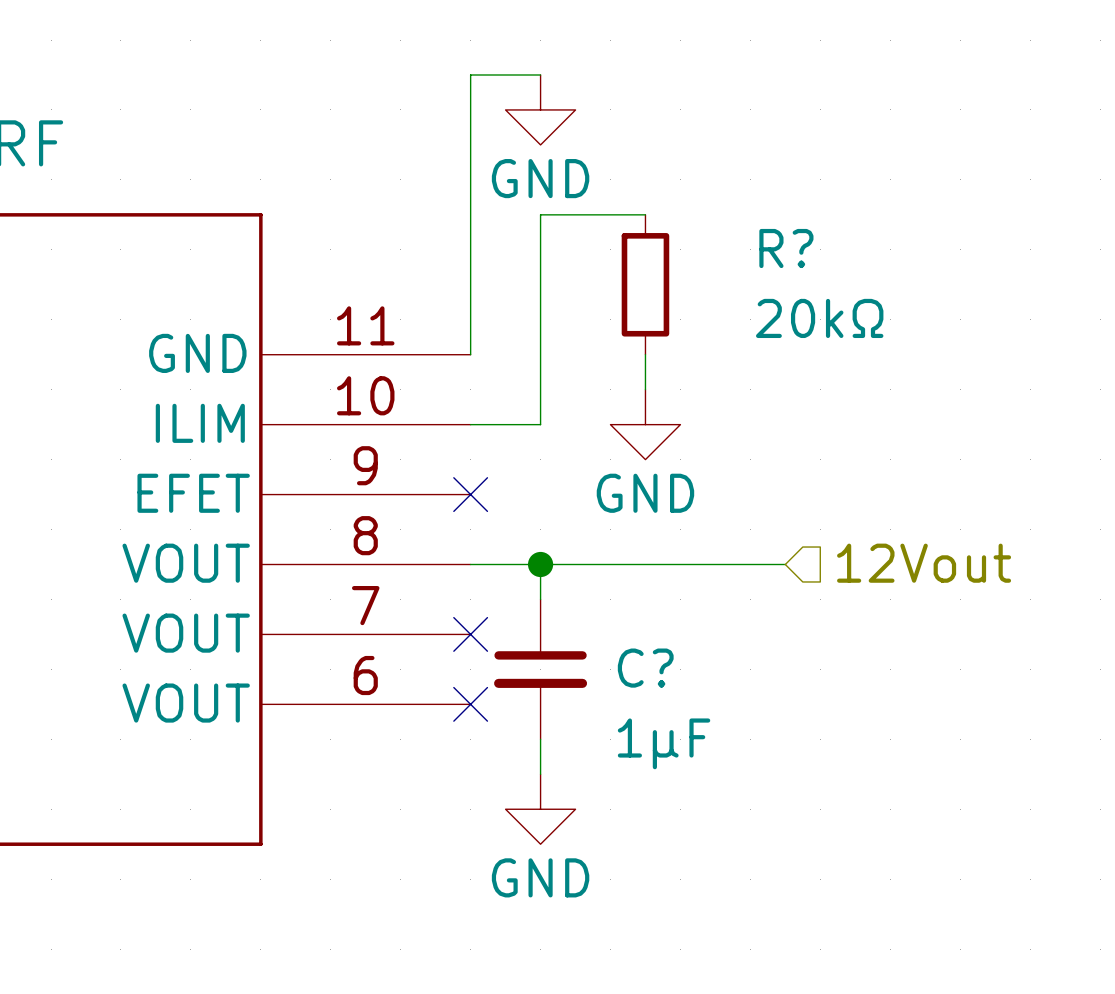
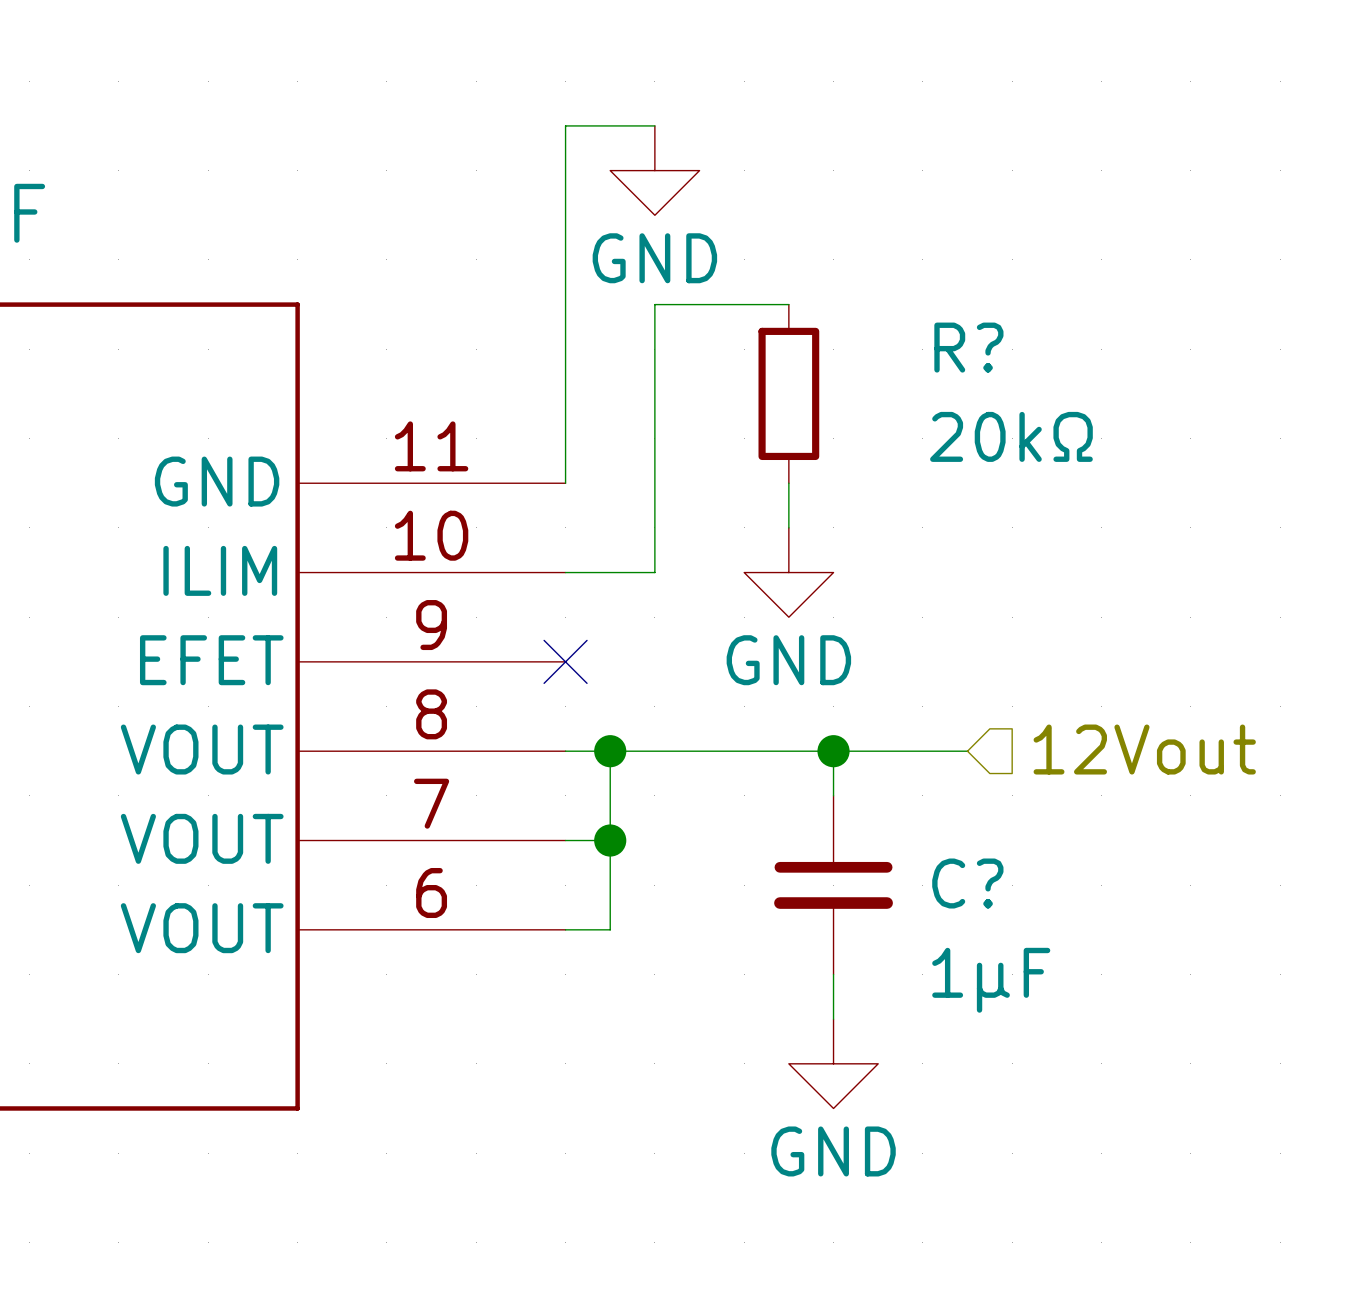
wire: none -> (610, 751) (610, 929) (565, 929)
wire: (540, 564) (540, 599) -> (833, 751) (833, 795)
junction position: (540, 564) -> (610, 751)
junction: none -> (833, 751)
wire: none -> (565, 840) (610, 840)
no-connect mark: (470, 634) -> none
junction: none -> (610, 840)
C? position: (540, 669) -> (833, 885)
no-connect mark: (470, 704) -> none
wire: (540, 739) (540, 774) -> (833, 974) (833, 1019)
power symbol position: GND (540, 809) -> GND (833, 1063)

